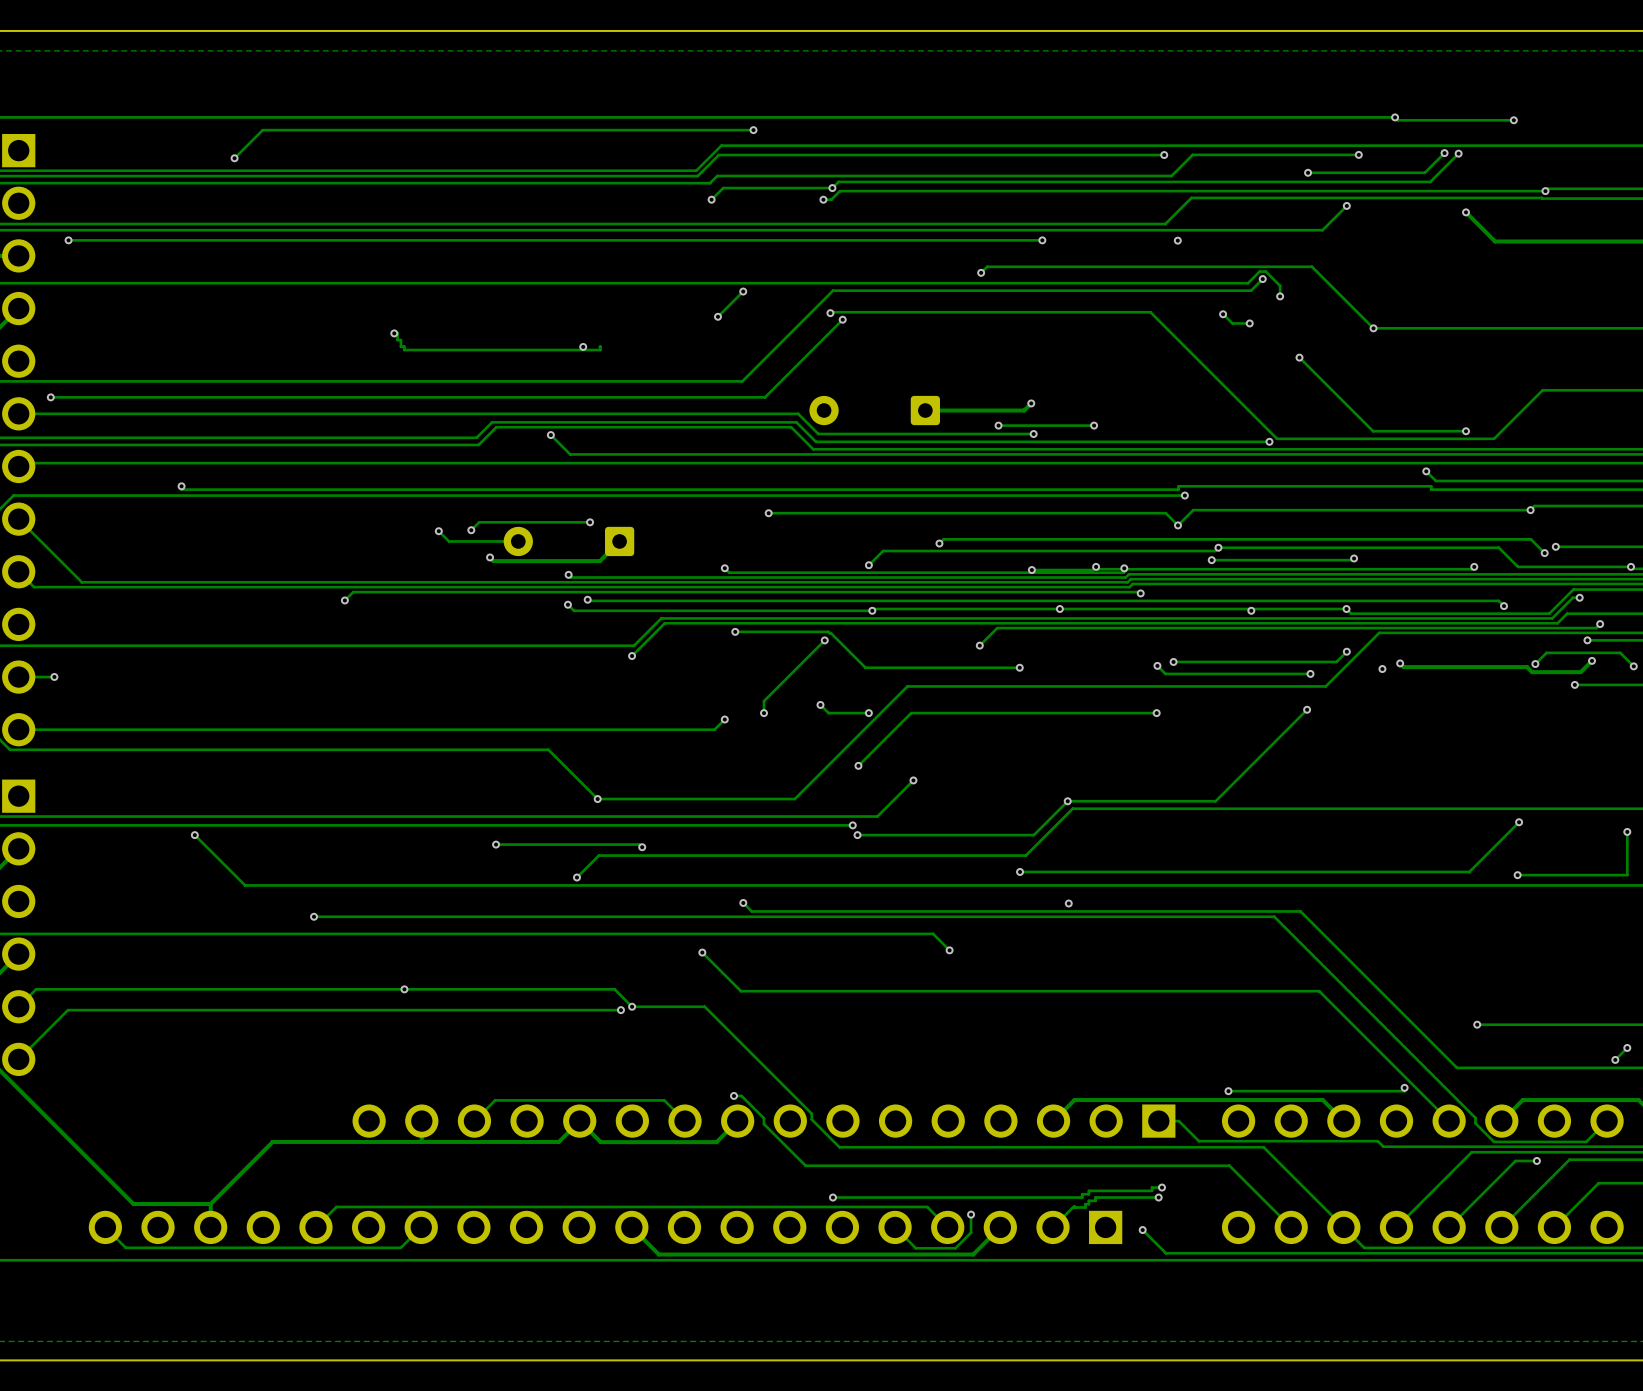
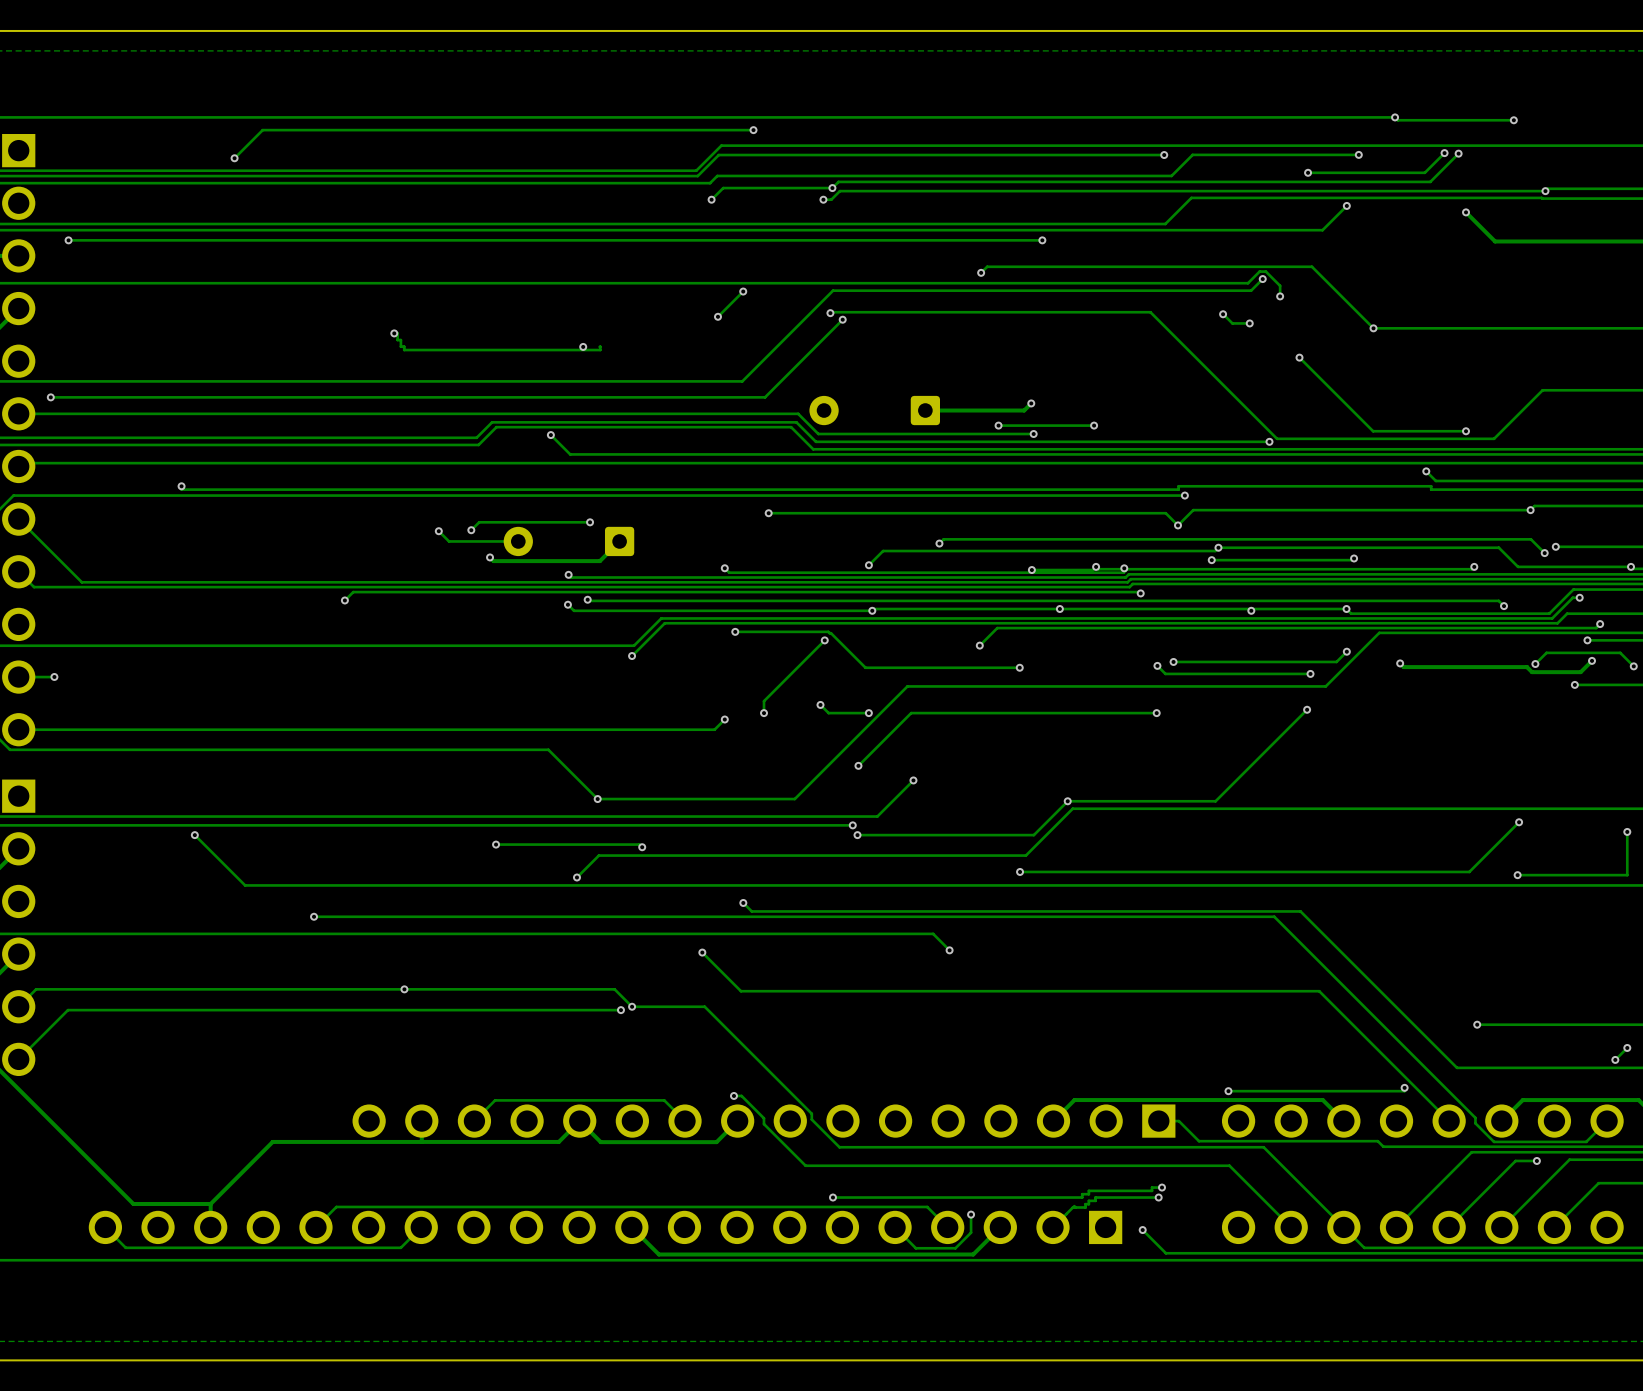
via: (1177, 240) -> none
via: (1382, 669) -> none
via: (1068, 903) -> none

